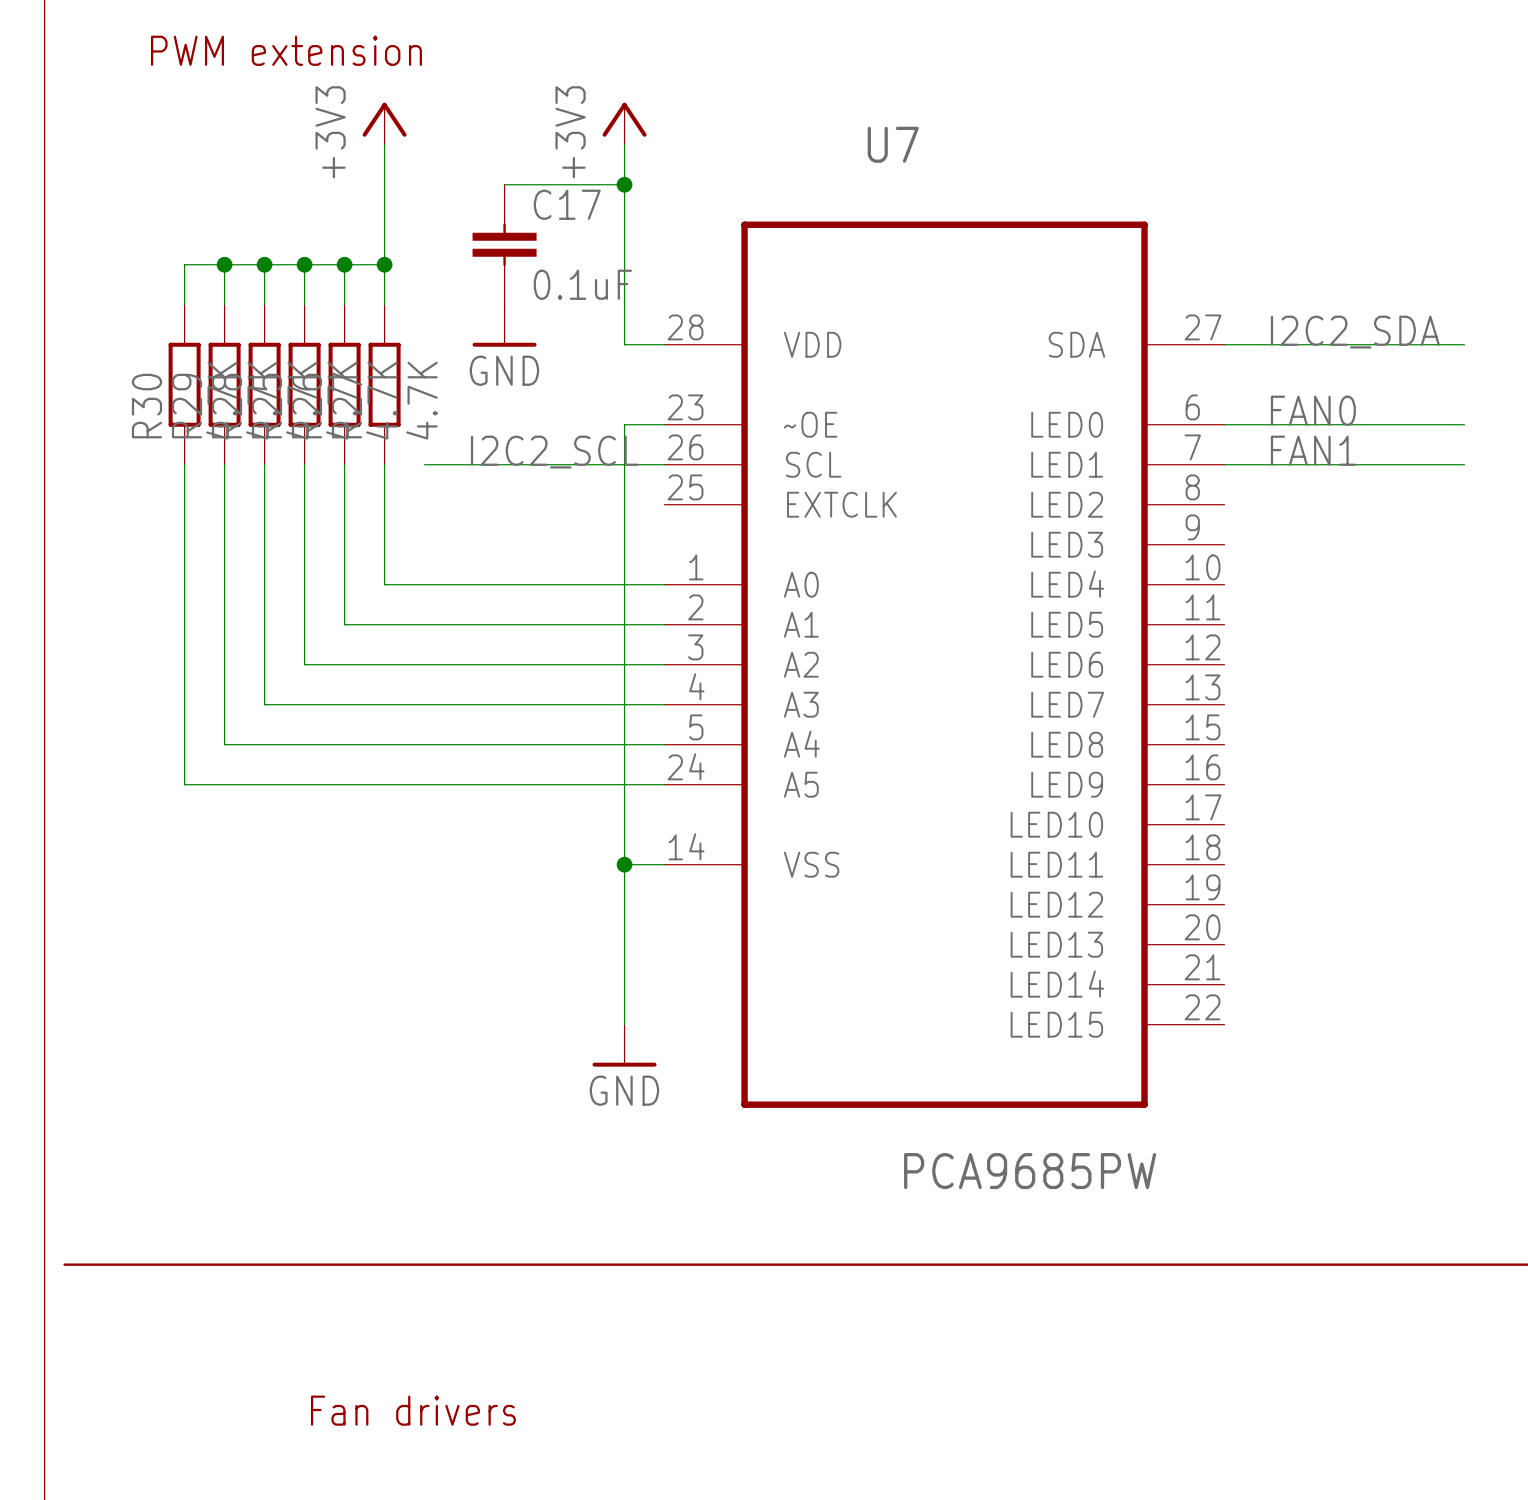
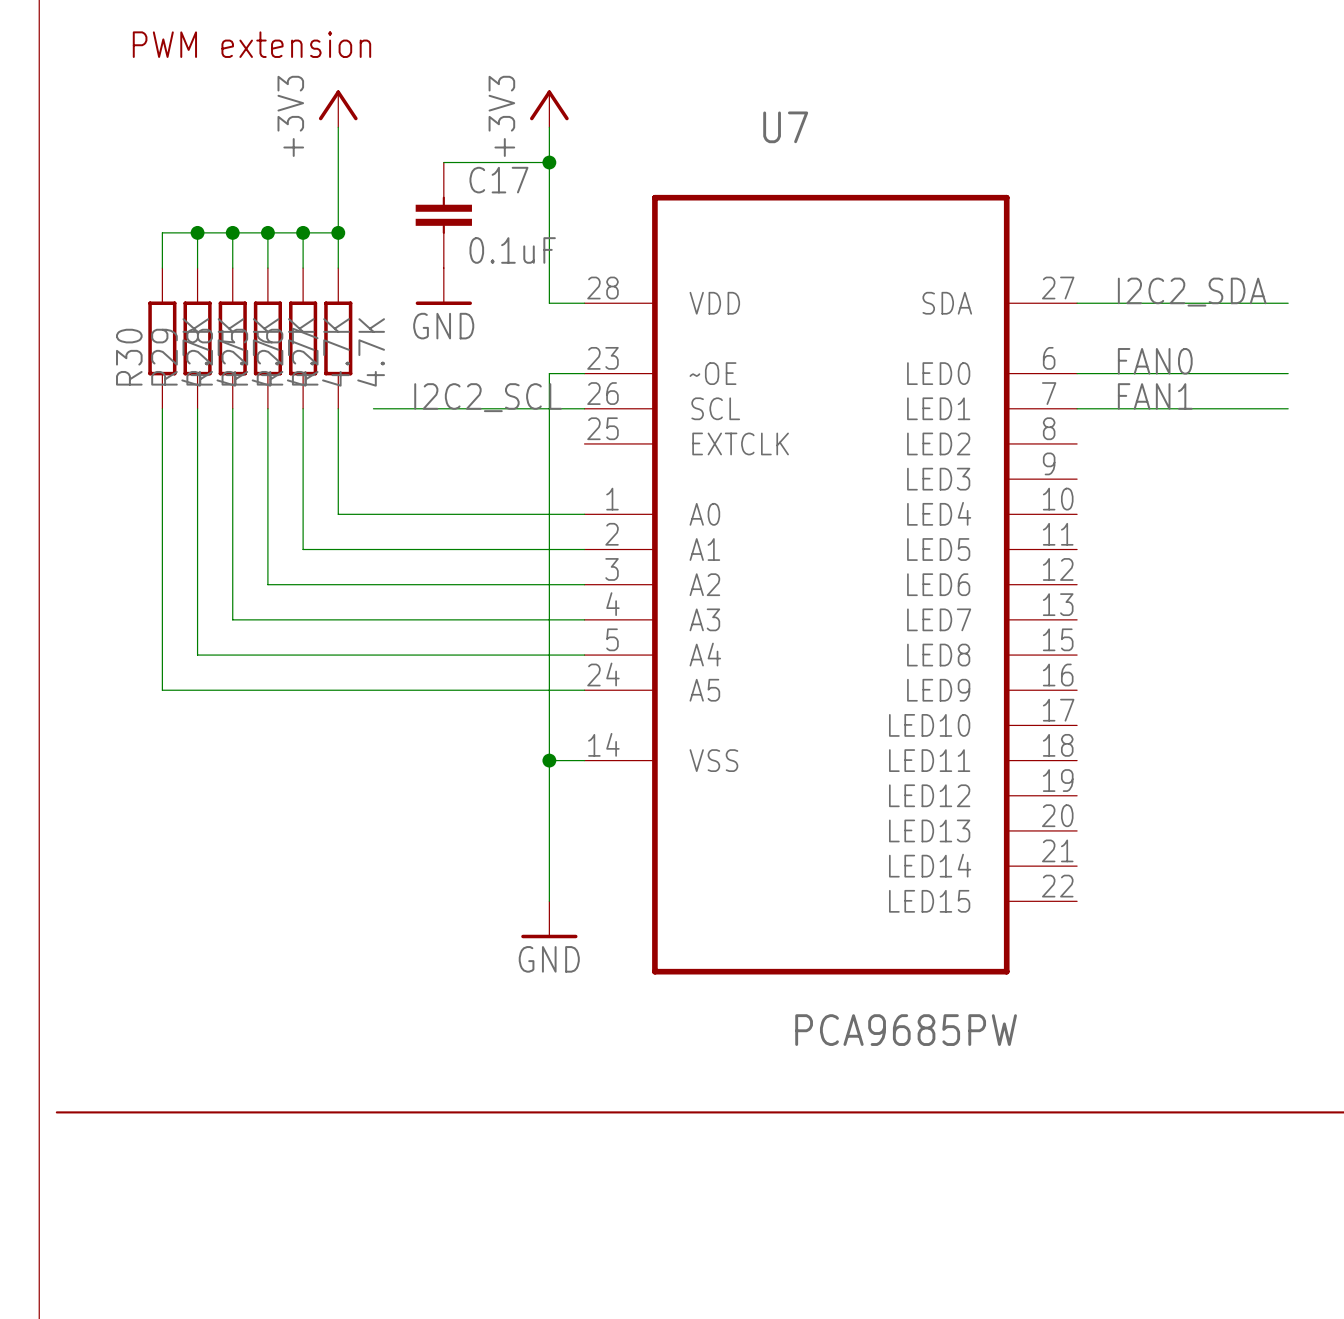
text: Fan drivers (413, 1410) -> none

